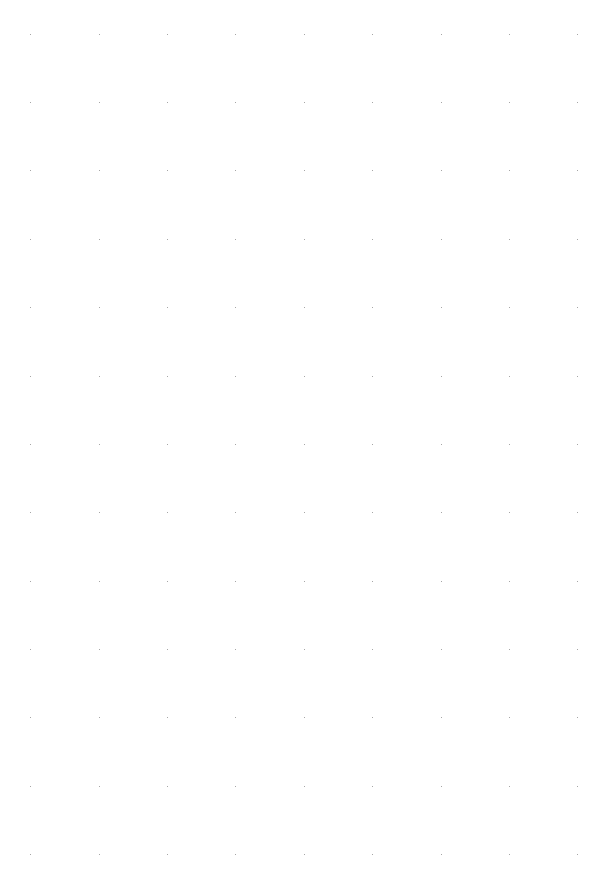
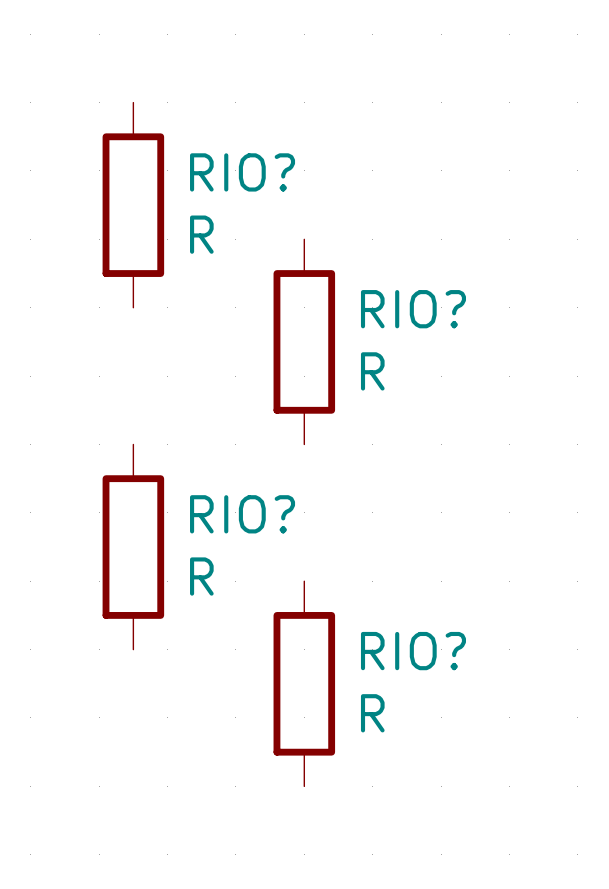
RIO?: none -> R (133, 205)
RIO?: none -> R (304, 341)
RIO?: none -> R (133, 547)
RIO?: none -> R (304, 683)

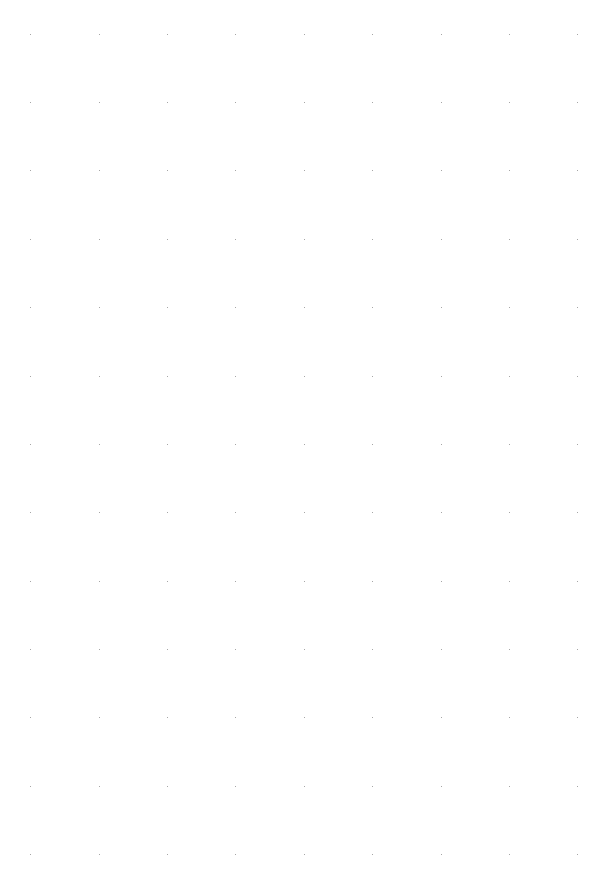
RIO?: R (133, 205) -> none
RIO?: R (304, 341) -> none
RIO?: R (133, 547) -> none
RIO?: R (304, 683) -> none

